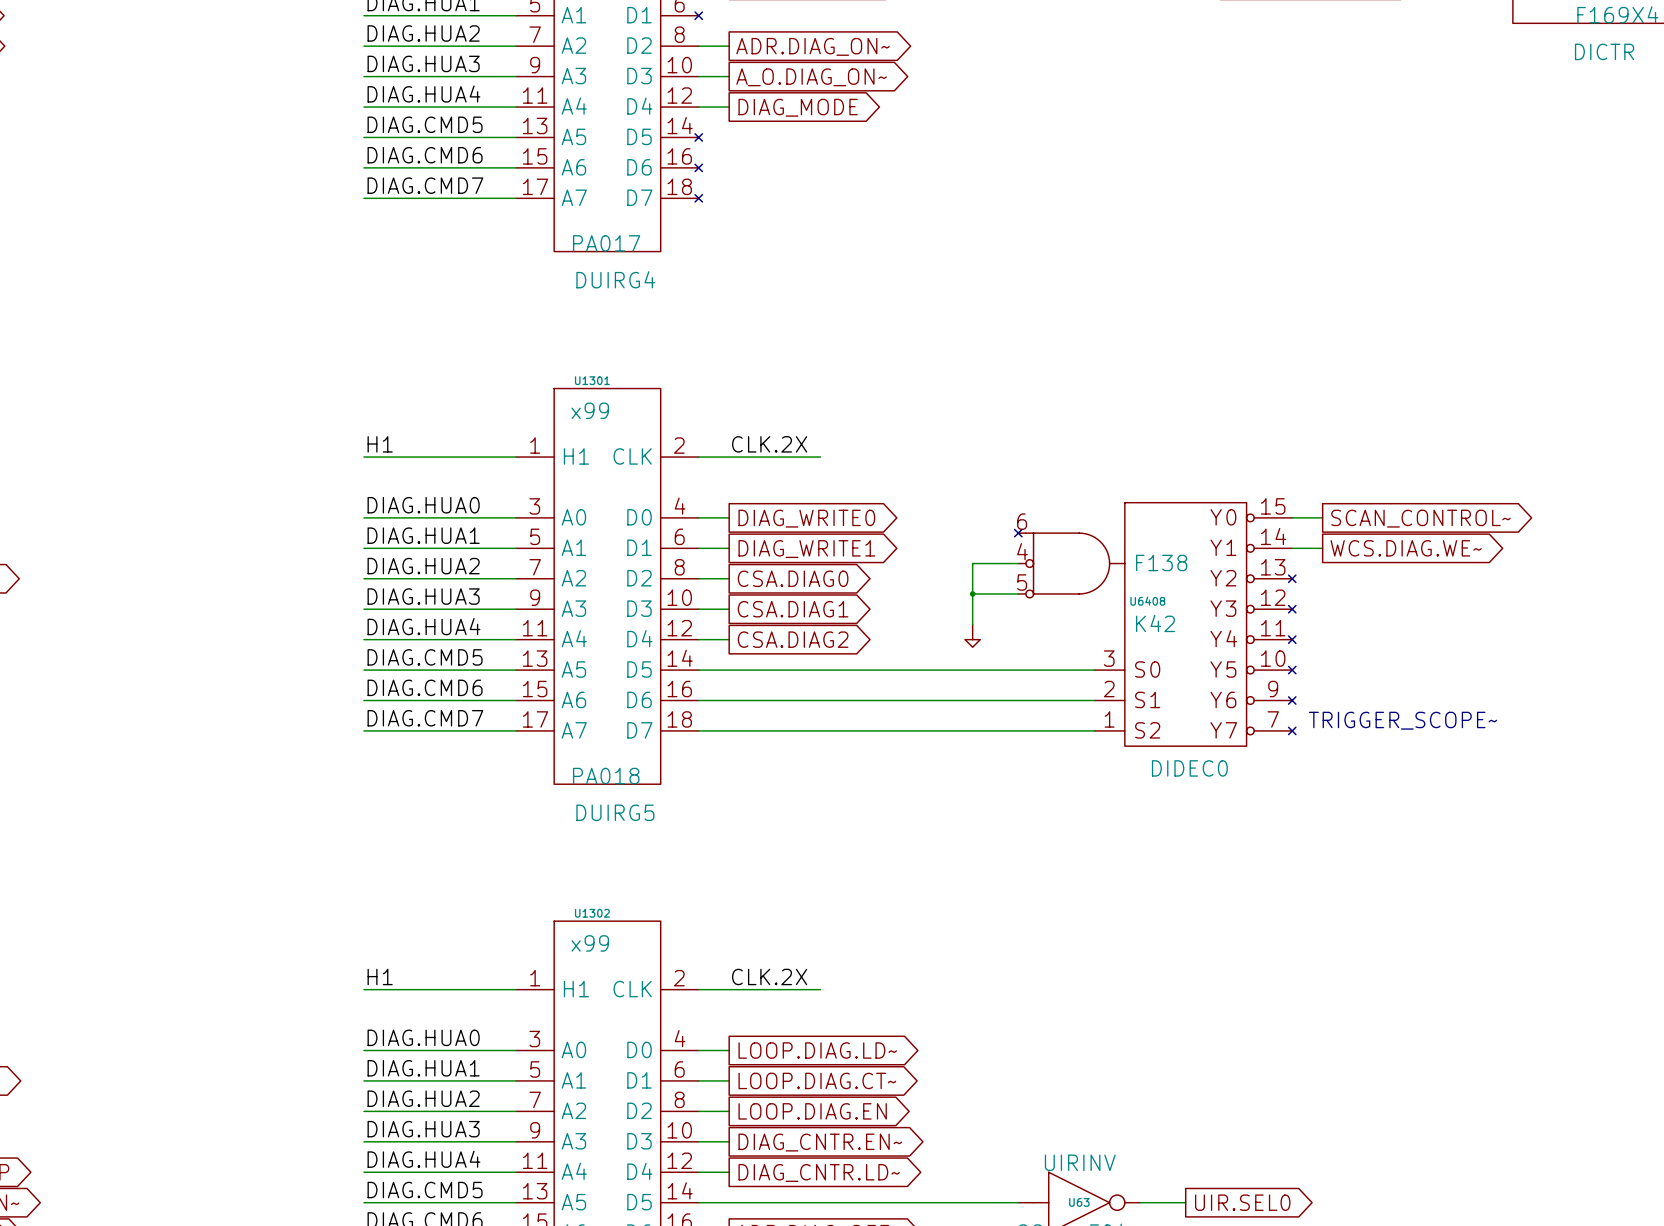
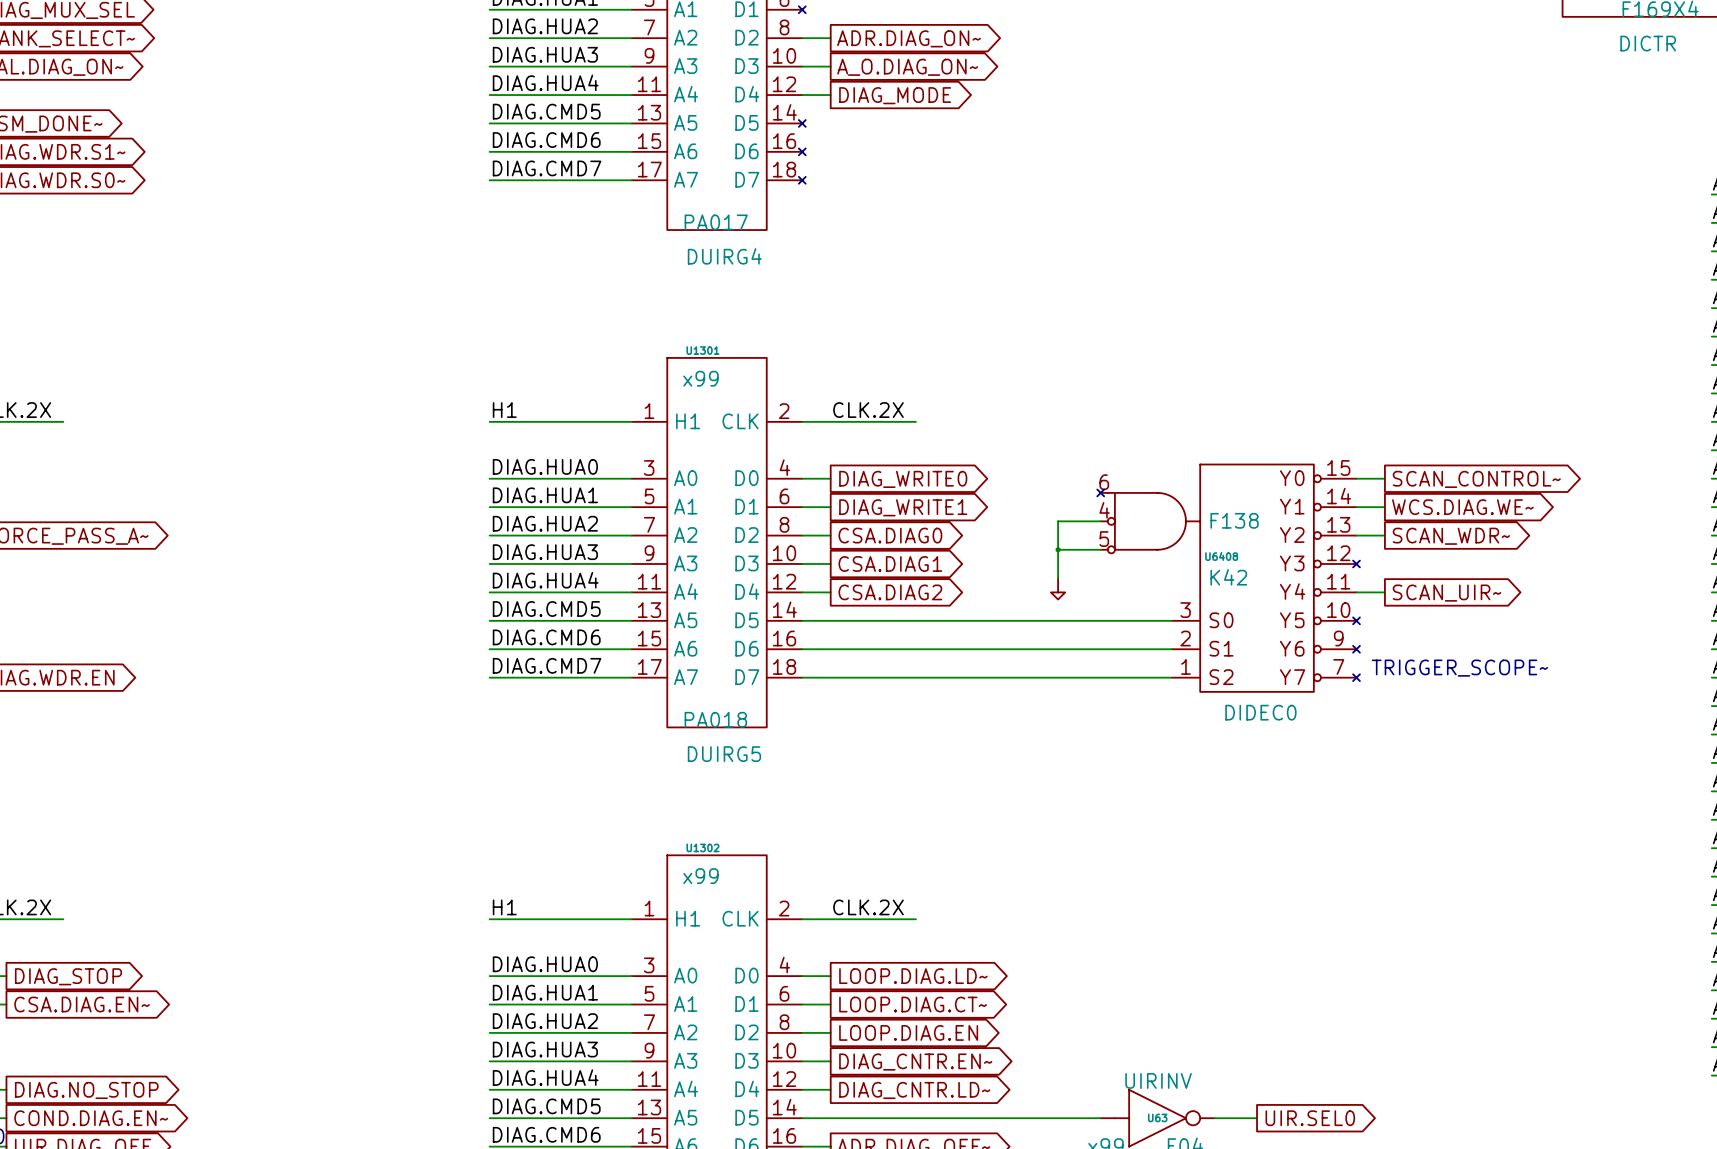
wire: none -> (1356, 535) (1384, 535)
no-connect mark: (1292, 578) -> none
global label: none -> SCAN_WDR~ (1451, 536)
wire: none -> (1356, 592) (1384, 592)
no-connect mark: (1292, 639) -> none
global label: none -> SCAN_UIR~ (1446, 593)

